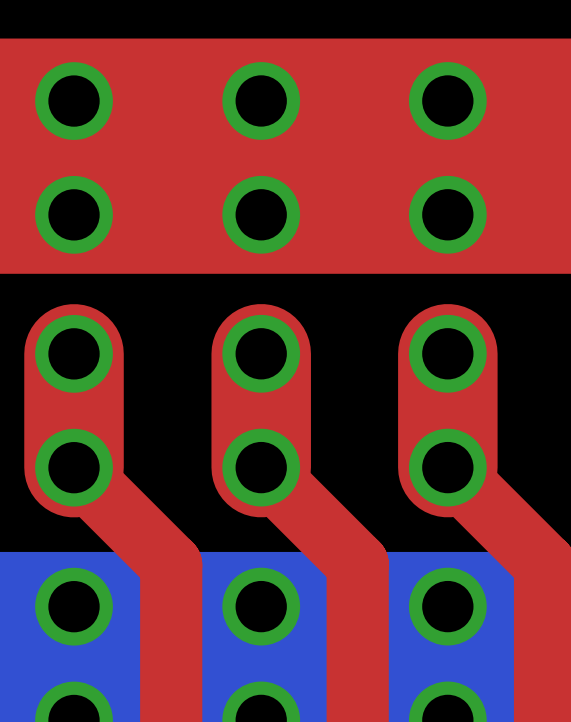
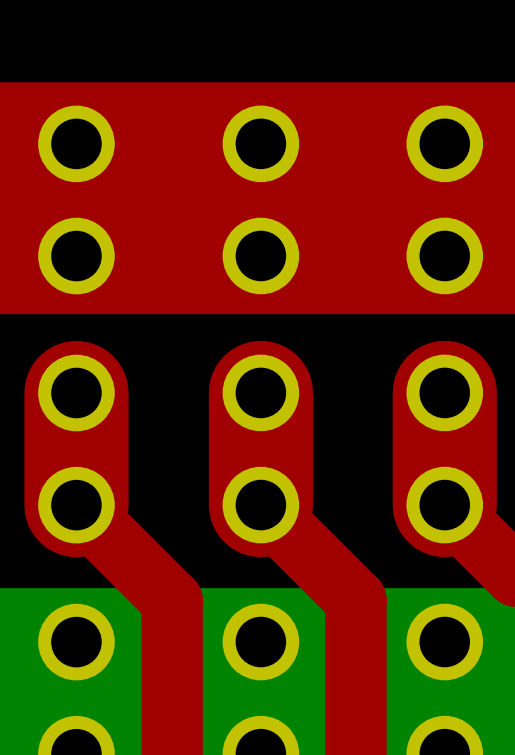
top track width: thin (74, 353) (74, 467) -> thick (76, 393) (76, 505)
top track width: thin (261, 353) (261, 467) -> thick (260, 392) (260, 505)
top track width: thin (447, 353) (447, 467) -> thick (444, 392) (444, 505)

